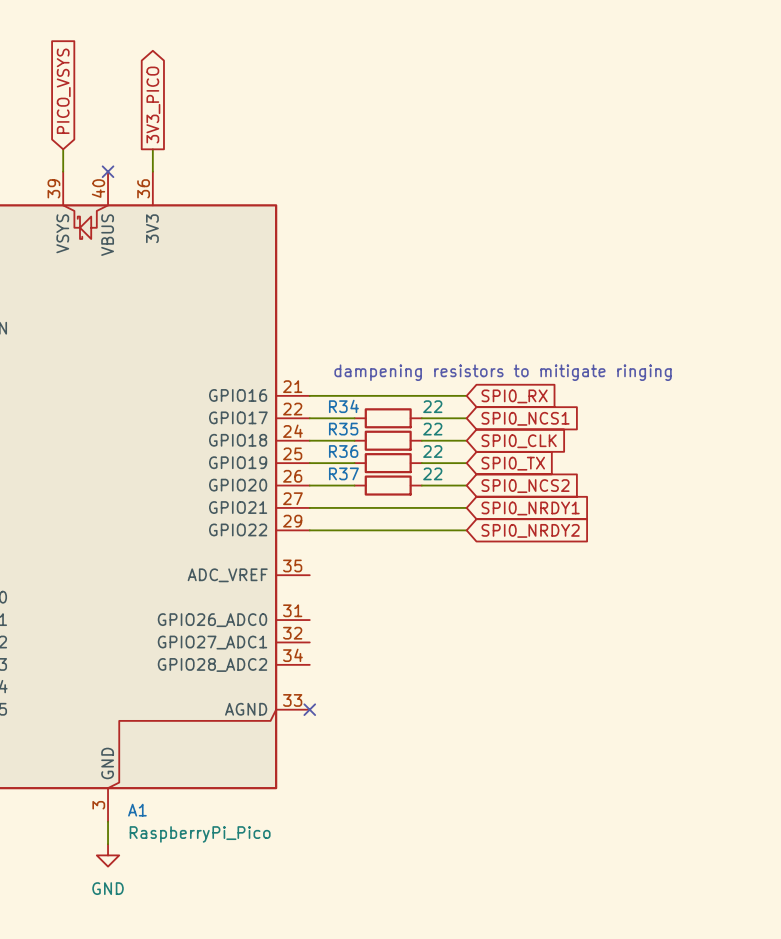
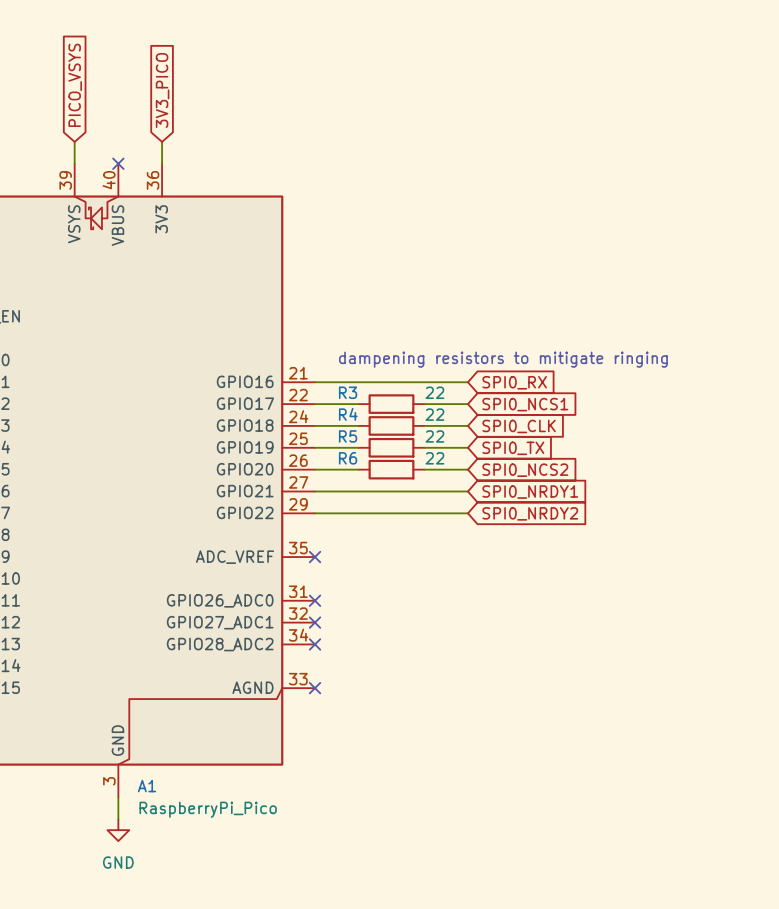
global label shape: output (153, 105) -> input (162, 90)
R34 name: R34 (343, 406) -> R3 (348, 392)
R35 name: R35 (343, 429) -> R4 (348, 414)
R36 name: R36 (343, 451) -> R5 (348, 436)
R37 name: R37 (343, 473) -> R6 (348, 458)
no-connect mark: none -> (315, 557)
no-connect mark: none -> (315, 600)
no-connect mark: none -> (315, 622)
no-connect mark: none -> (315, 644)

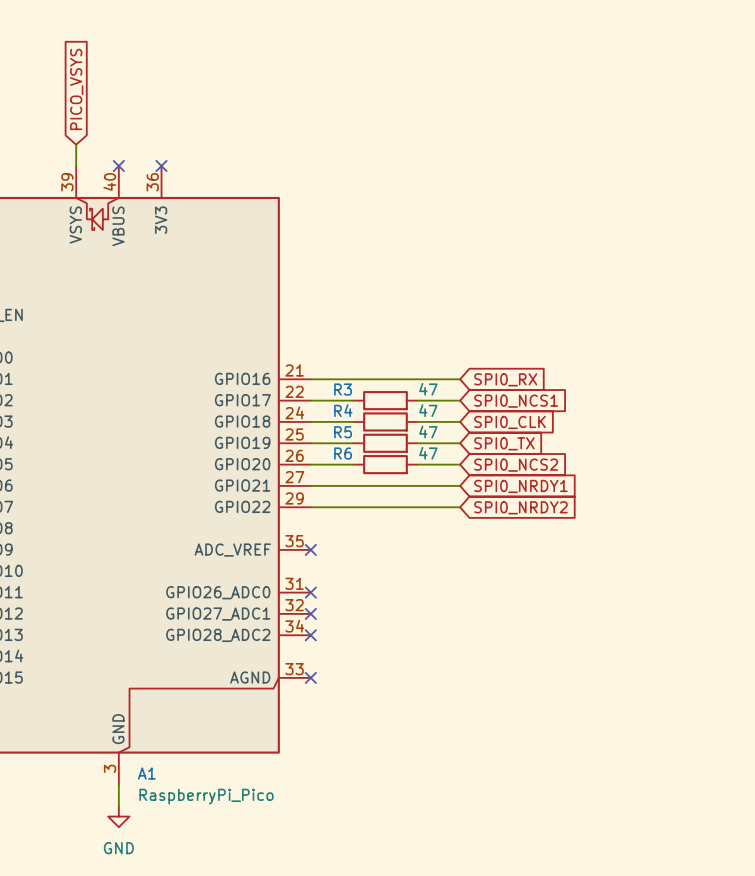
global label: 3V3_PICO (162, 90) -> none
wire: (162, 141) (162, 163) -> none
no-connect mark: none -> (161, 166)
text: dampening resistors to mitigate ringing (503, 359) -> none
R3 value: 22 (434, 392) -> 47 (428, 389)
R4 value: 22 (434, 414) -> 47 (428, 410)
R5 value: 22 (434, 436) -> 47 (428, 431)
R6 value: 22 (434, 458) -> 47 (428, 453)

